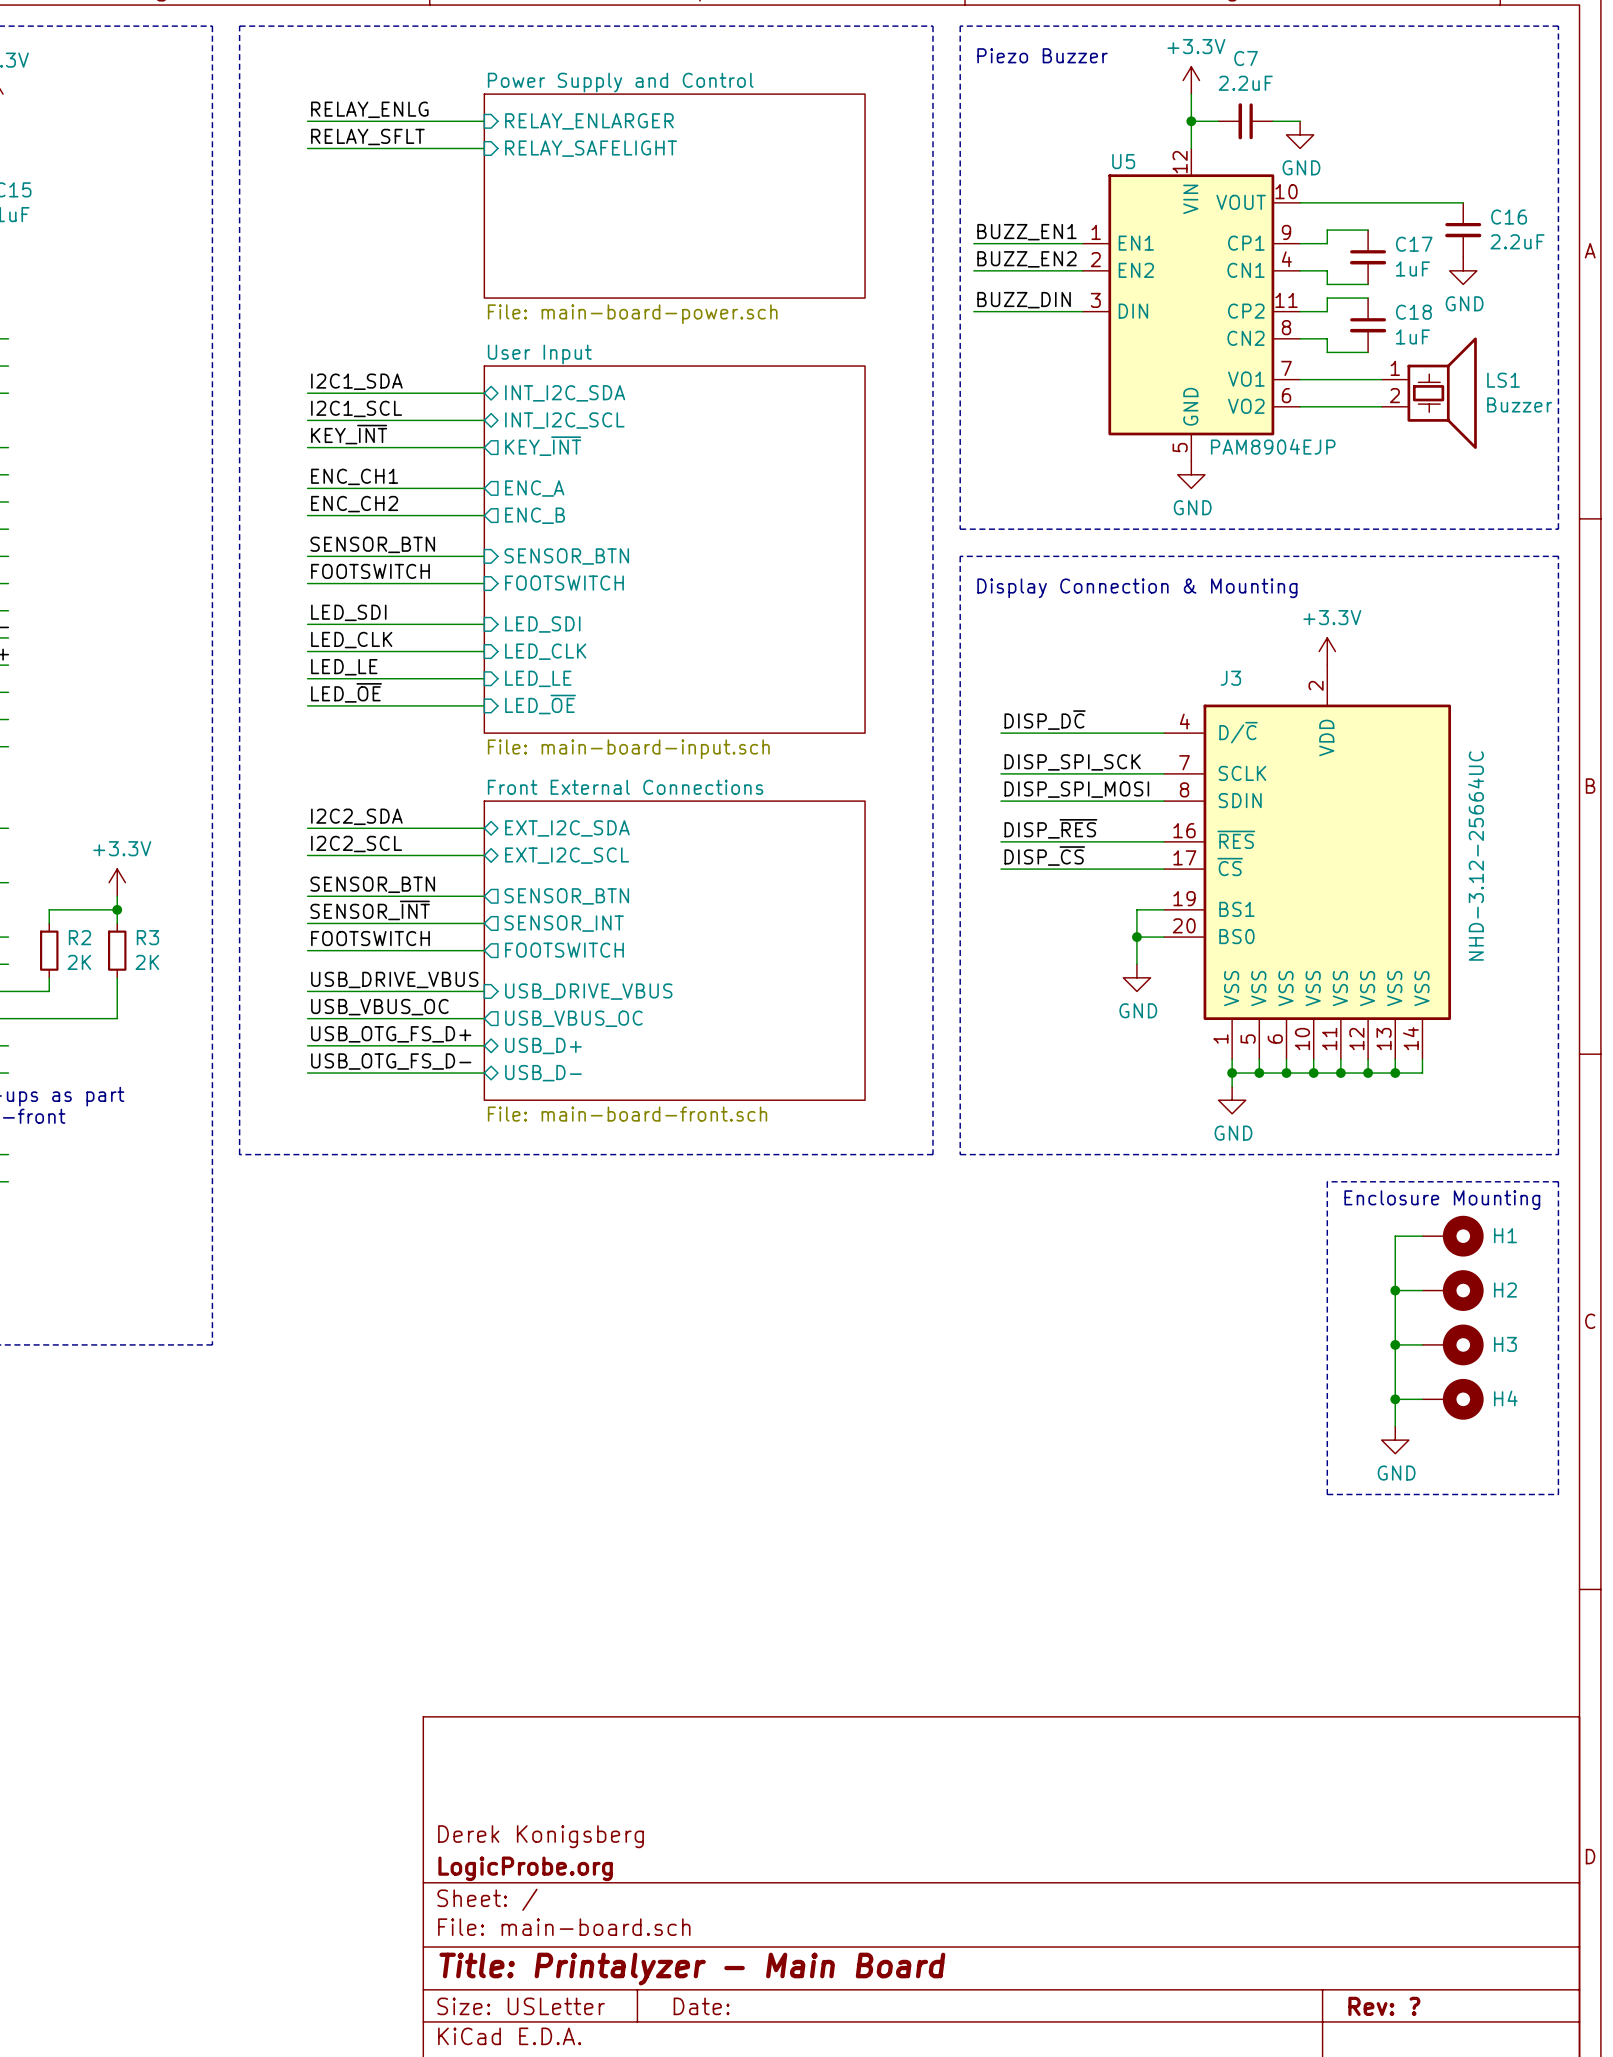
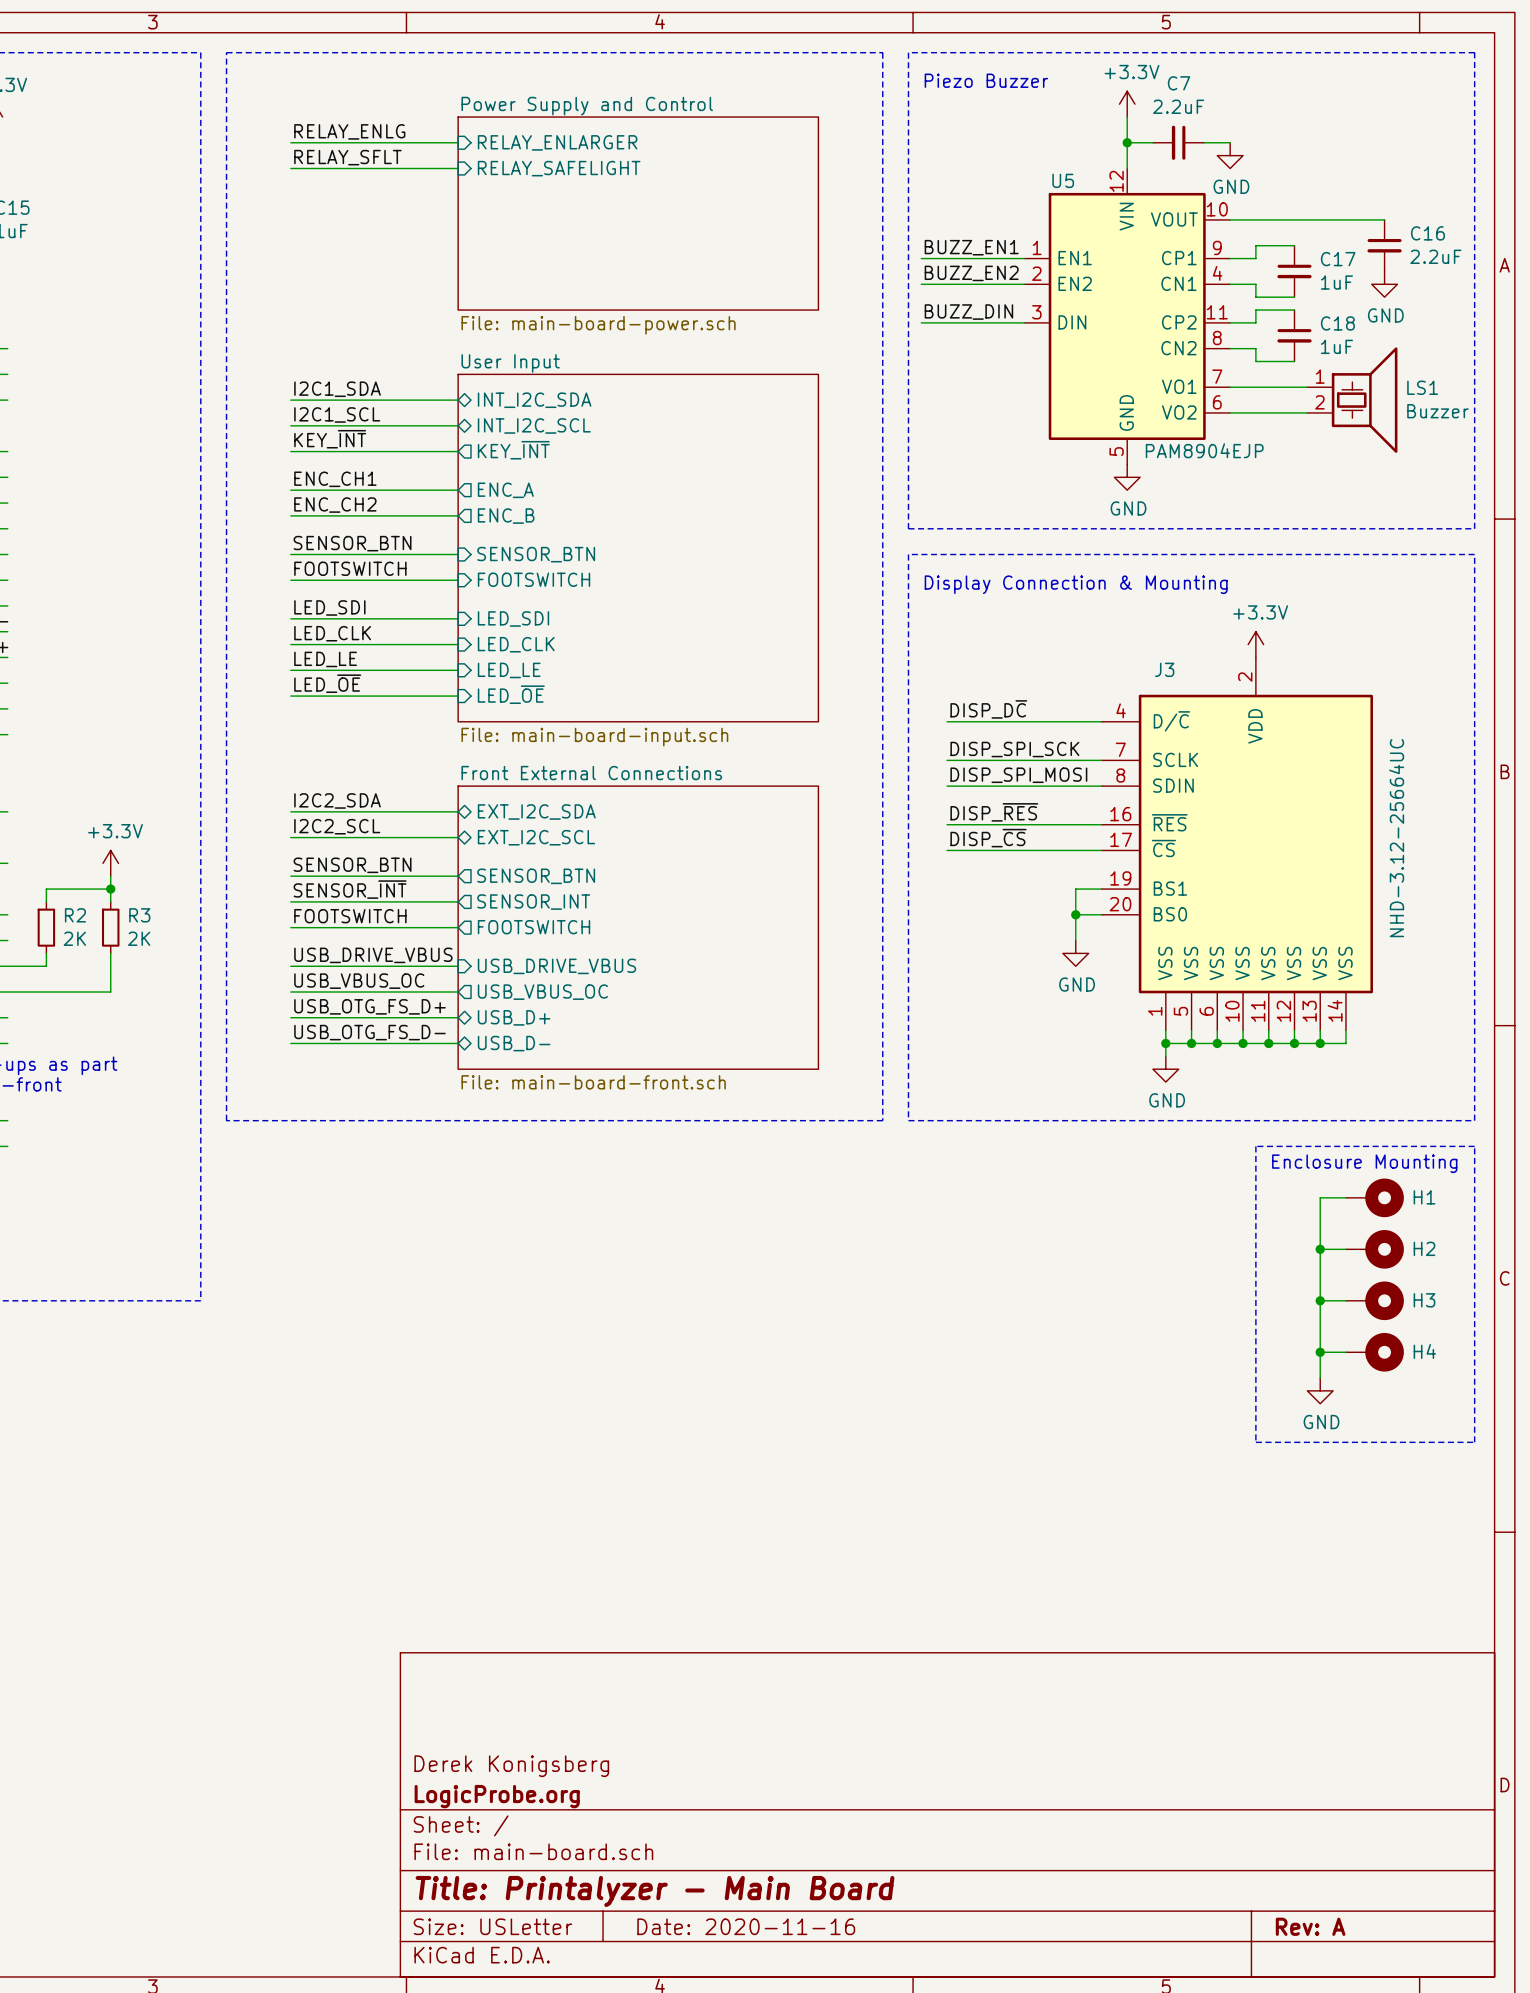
title block: Date: (701, 2006) -> Date: 2020-11-16 (746, 1926)
title block: Rev: ? (1384, 2006) -> Rev: A (1310, 1926)

